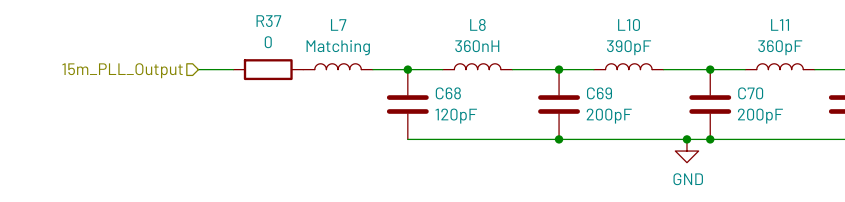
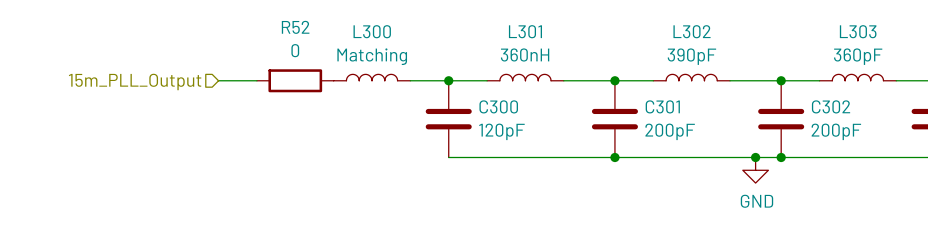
R37 name: R37 (268, 21) -> R52 (295, 27)
L7 name: L7 (338, 24) -> L300 (372, 31)
L8 name: L8 (477, 24) -> L301 (525, 31)
L10 name: L10 (629, 24) -> L302 (692, 31)
L11 name: L11 (780, 24) -> L303 (858, 31)
C68 name: C68 (448, 93) -> C300 (498, 106)
C69 name: C69 (599, 93) -> C301 (662, 106)
C70 name: C70 (750, 93) -> C302 (831, 106)

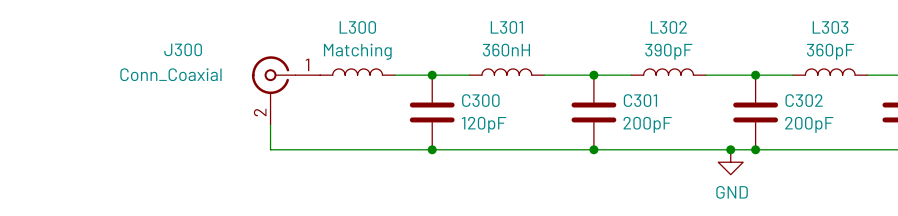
wire: (218, 80) (256, 80) -> none
R52: 0 (295, 80) -> none
hierarchical label: 15m_PLL_Output (135, 81) -> none
J300: none -> Conn_Coaxial (286, 90)
wire: none -> (270, 124) (270, 149) (432, 149)
junction: none -> (432, 149)

